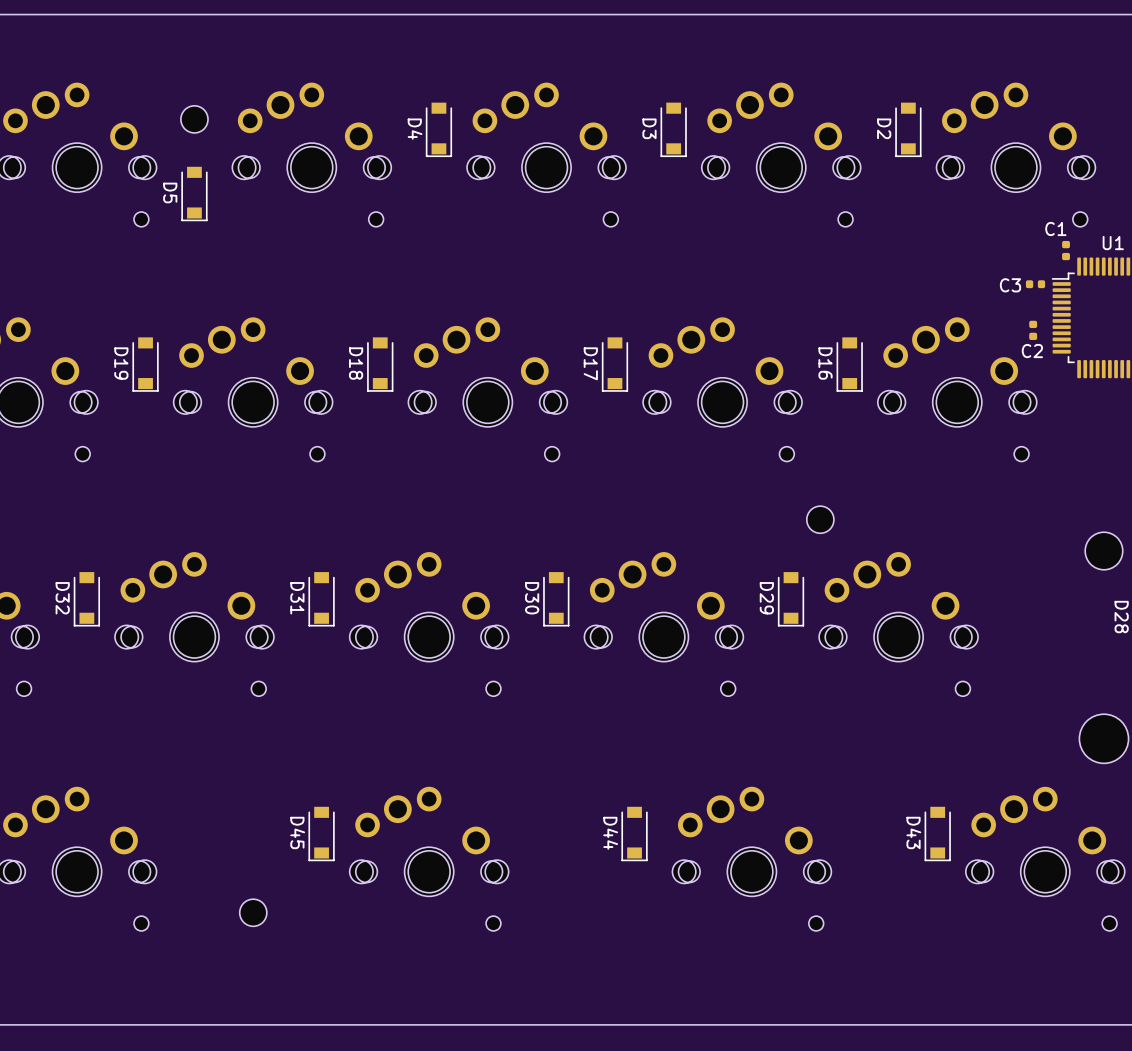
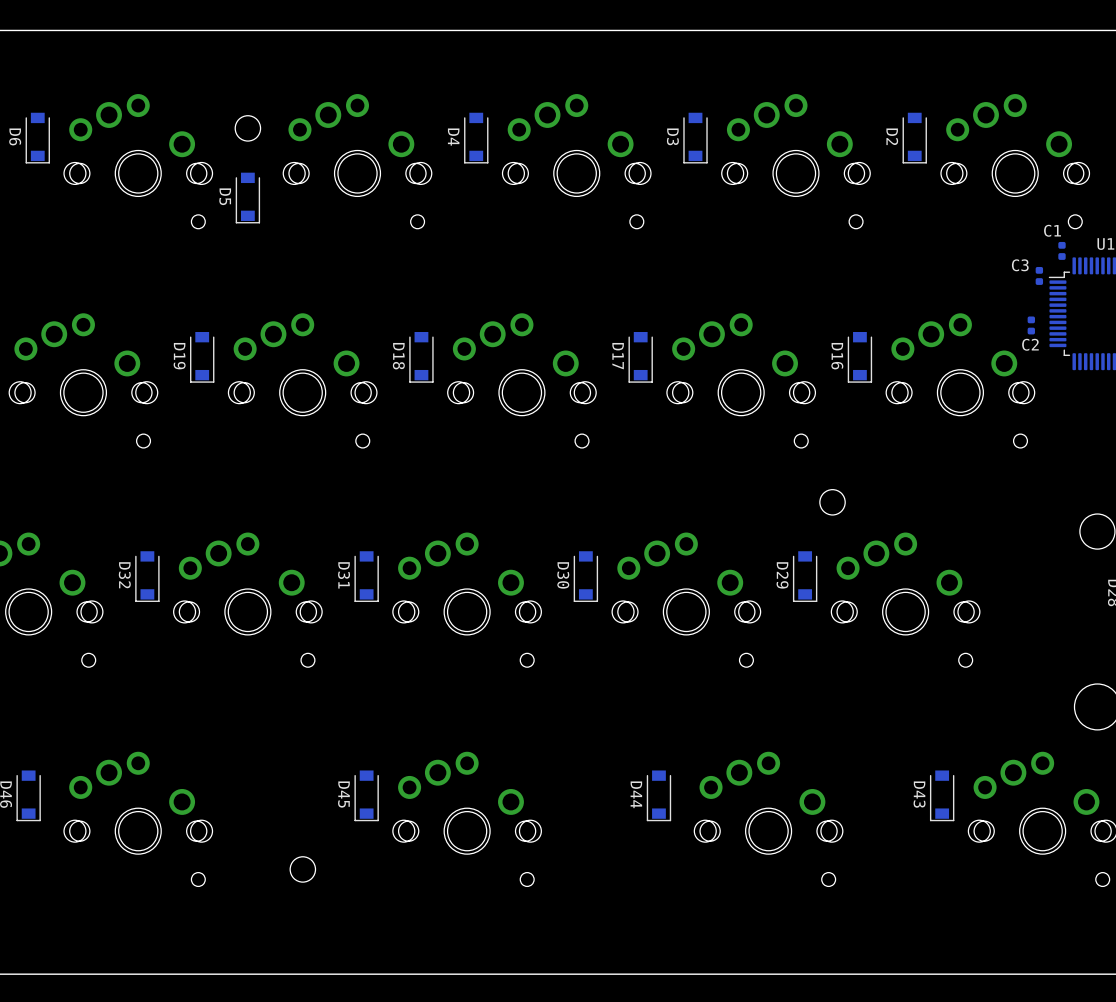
C3 rotation: 0° (1035, 284) -> 90° clockwise (1039, 275)

